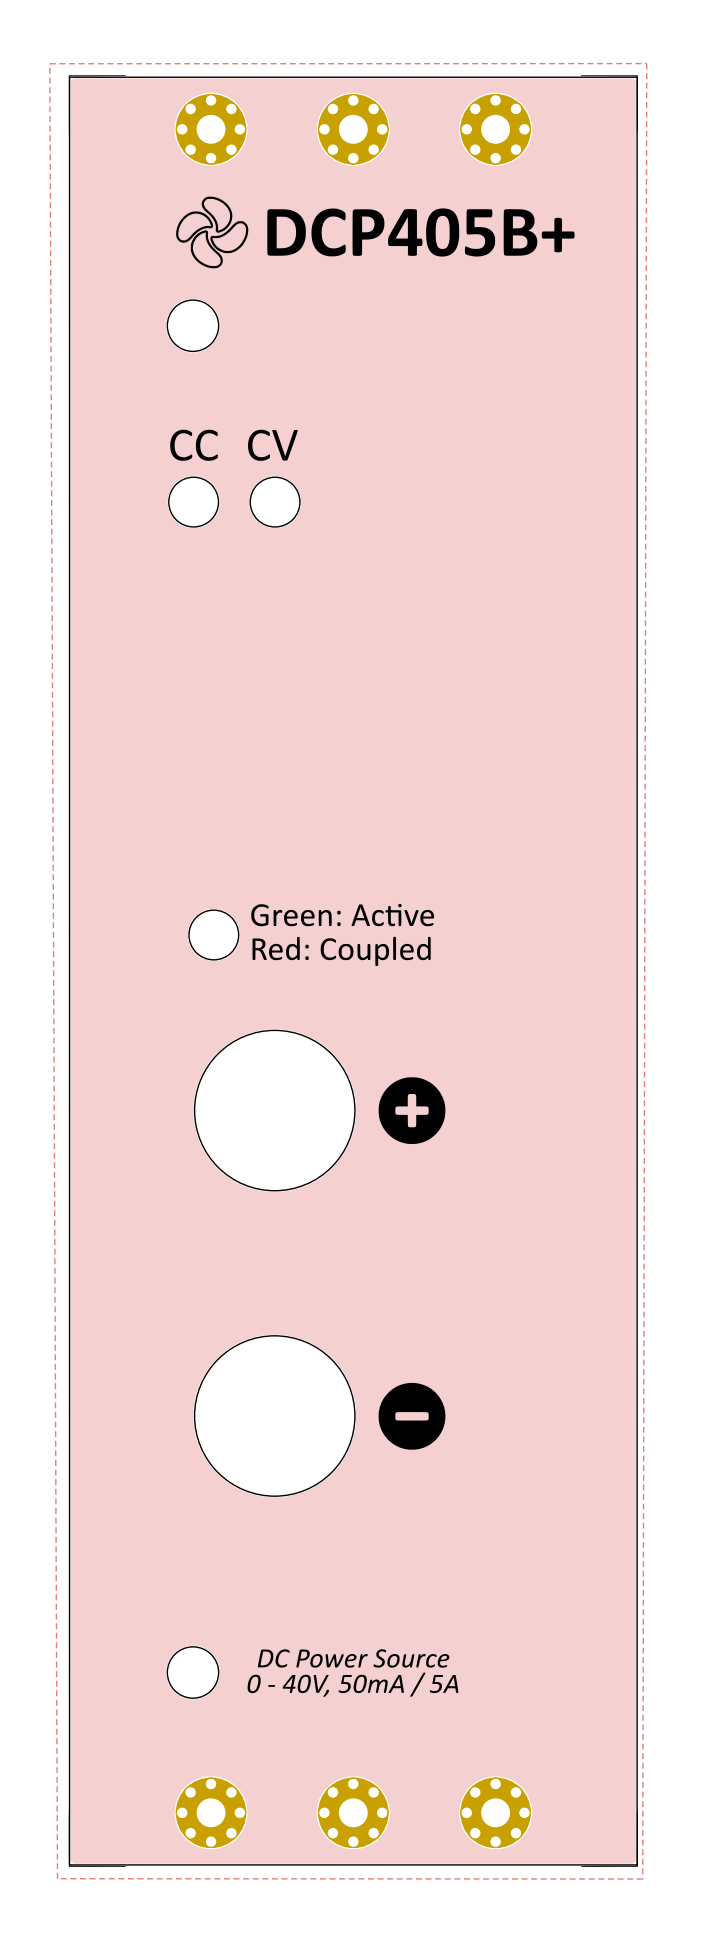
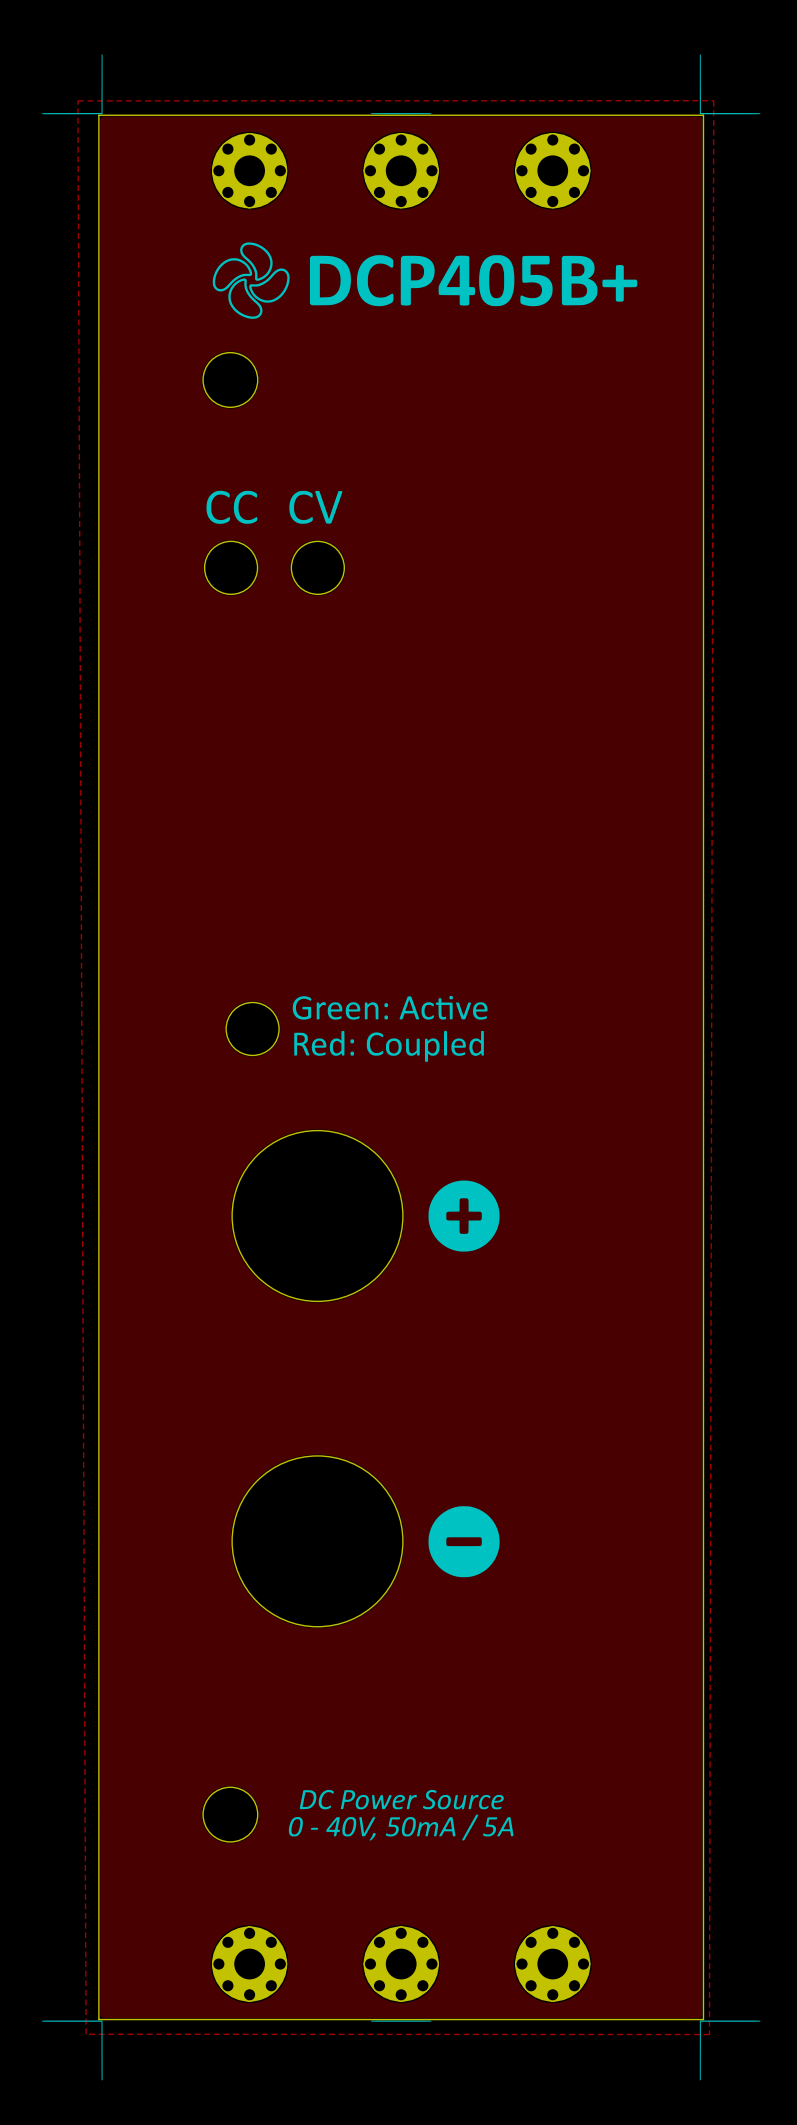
drawing shape: [68, 75, 638, 1867] -> [42, 54, 761, 2081]

